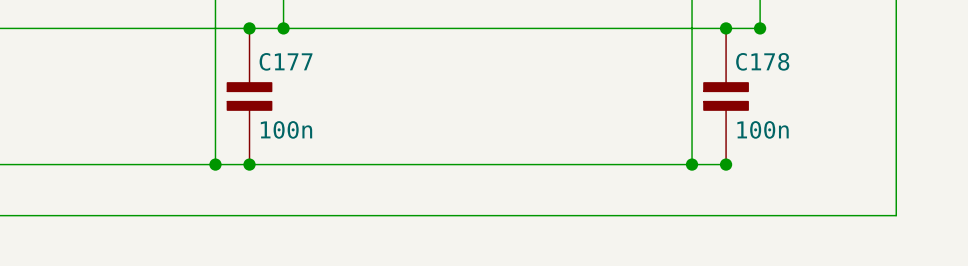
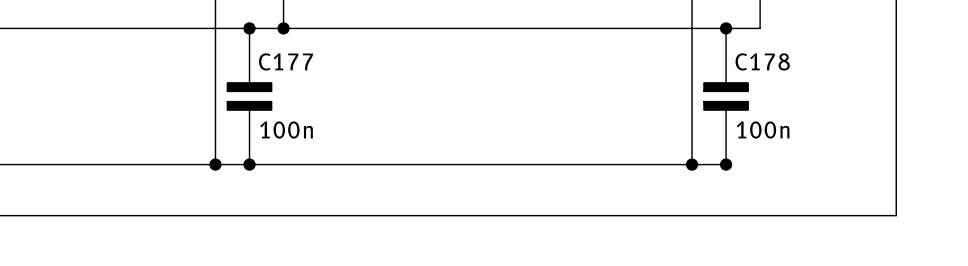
junction: (760, 28) -> none

